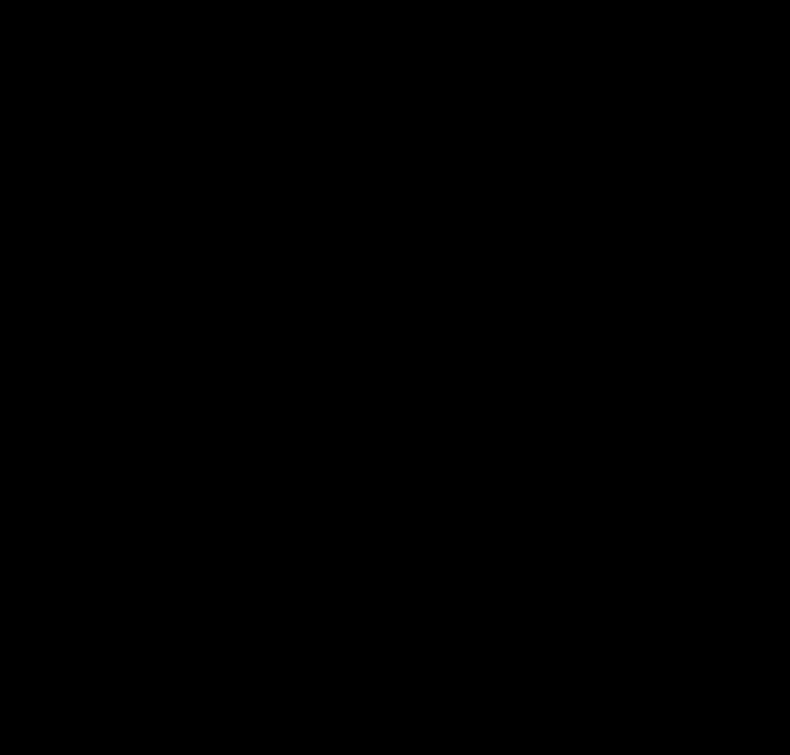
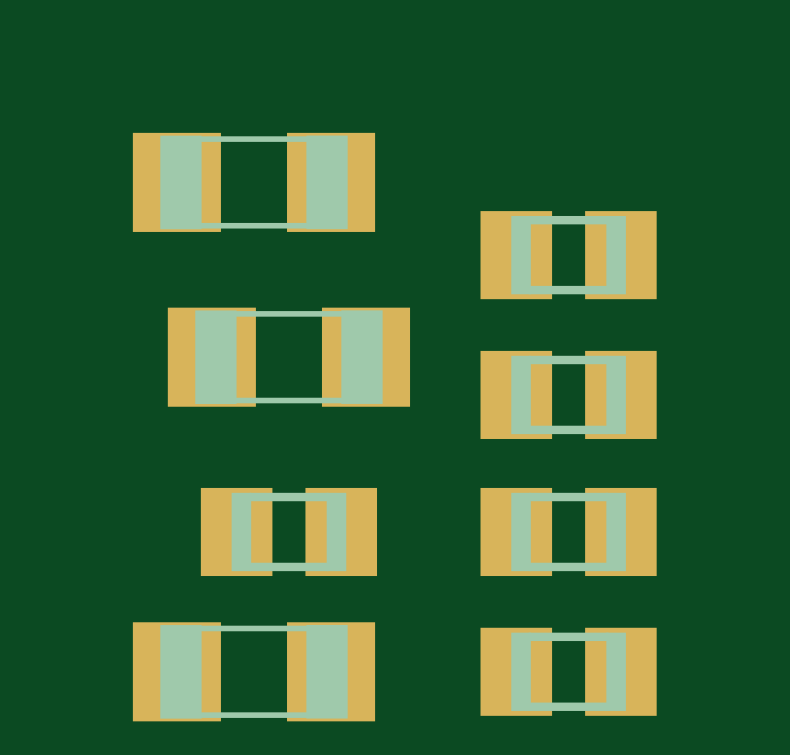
part: none -> (253, 182)
part: none -> (568, 255)
part: none -> (288, 357)
part: none -> (568, 394)
part: none -> (288, 531)
part: none -> (568, 531)
part: none -> (253, 671)
part: none -> (568, 671)

